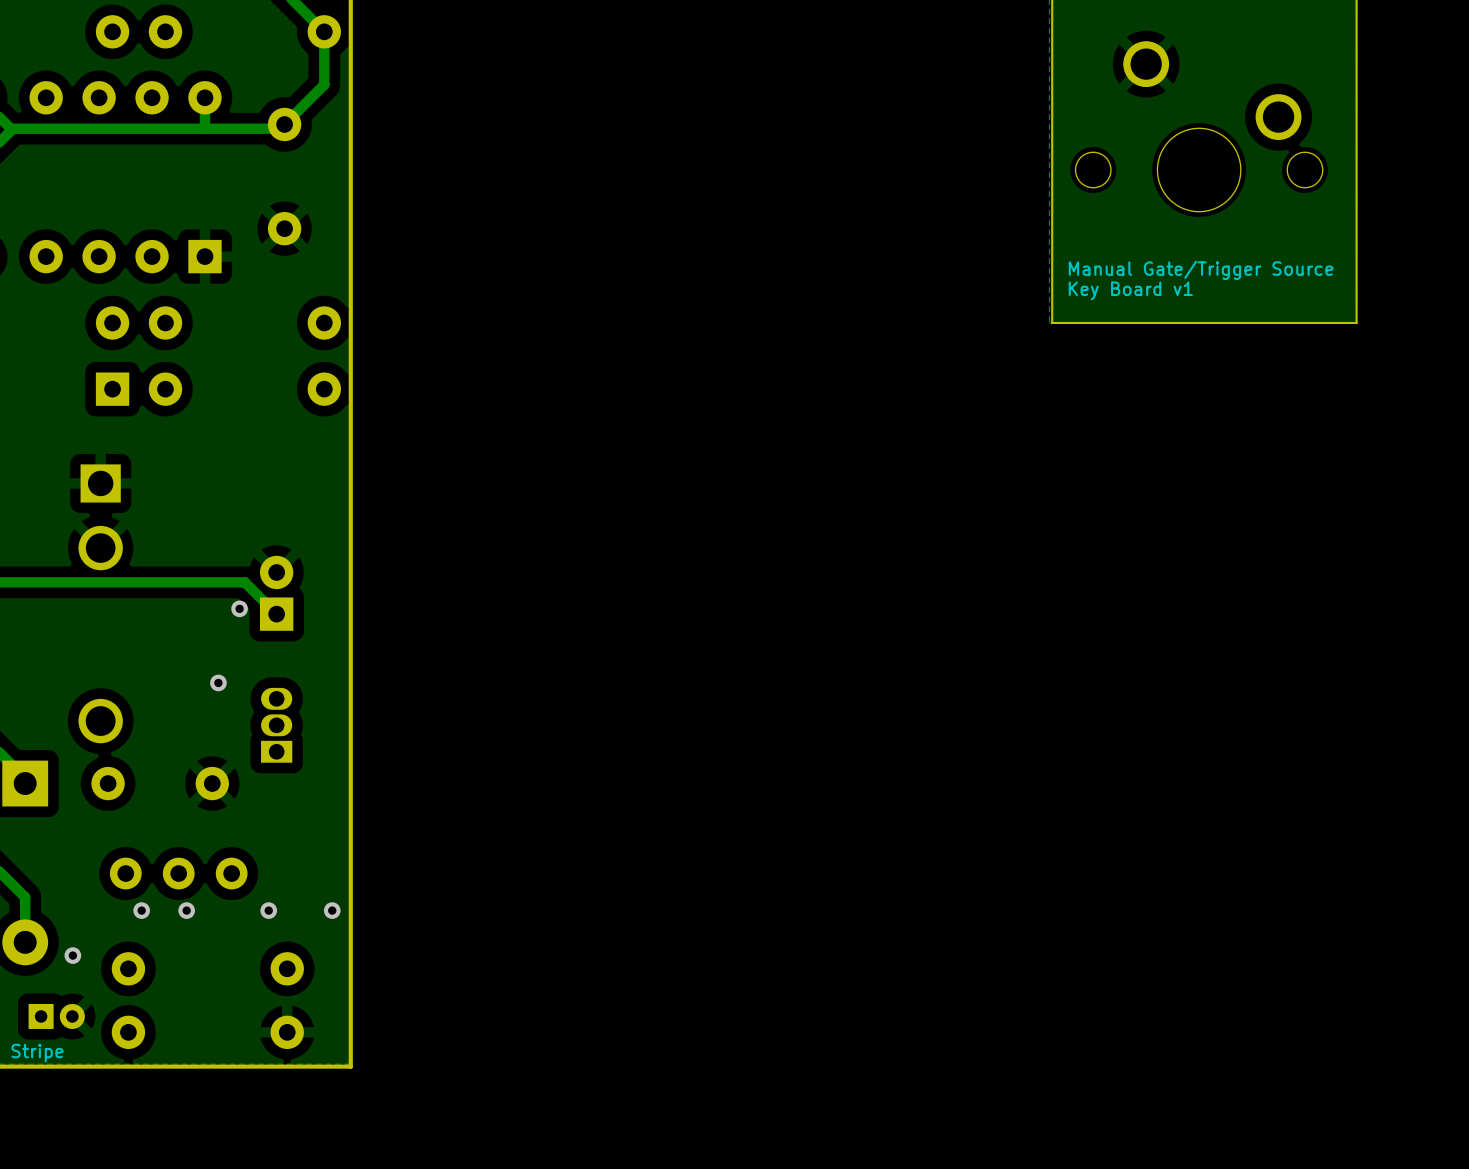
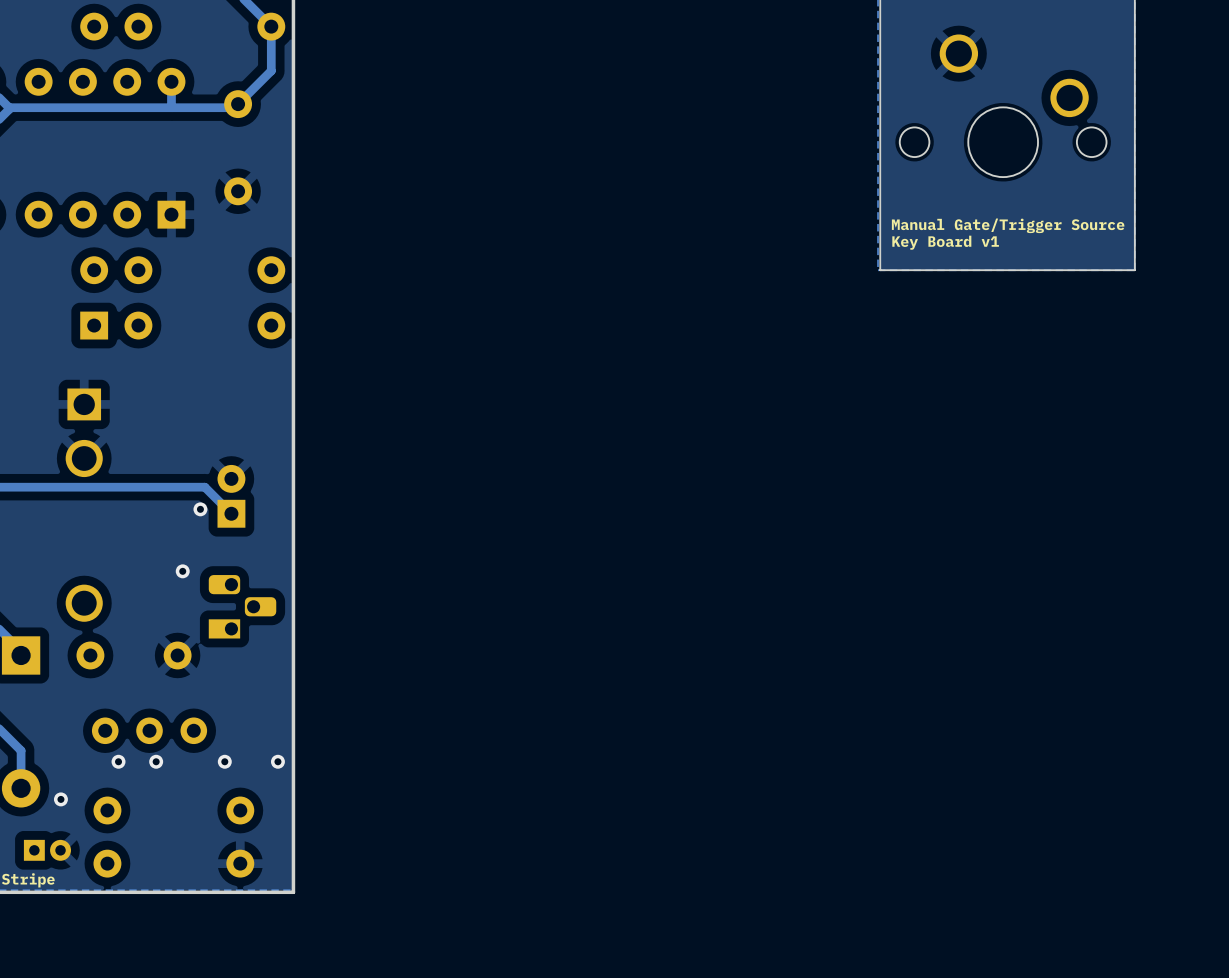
part footprint: [261, 687, 293, 763] -> [208, 575, 277, 639]

